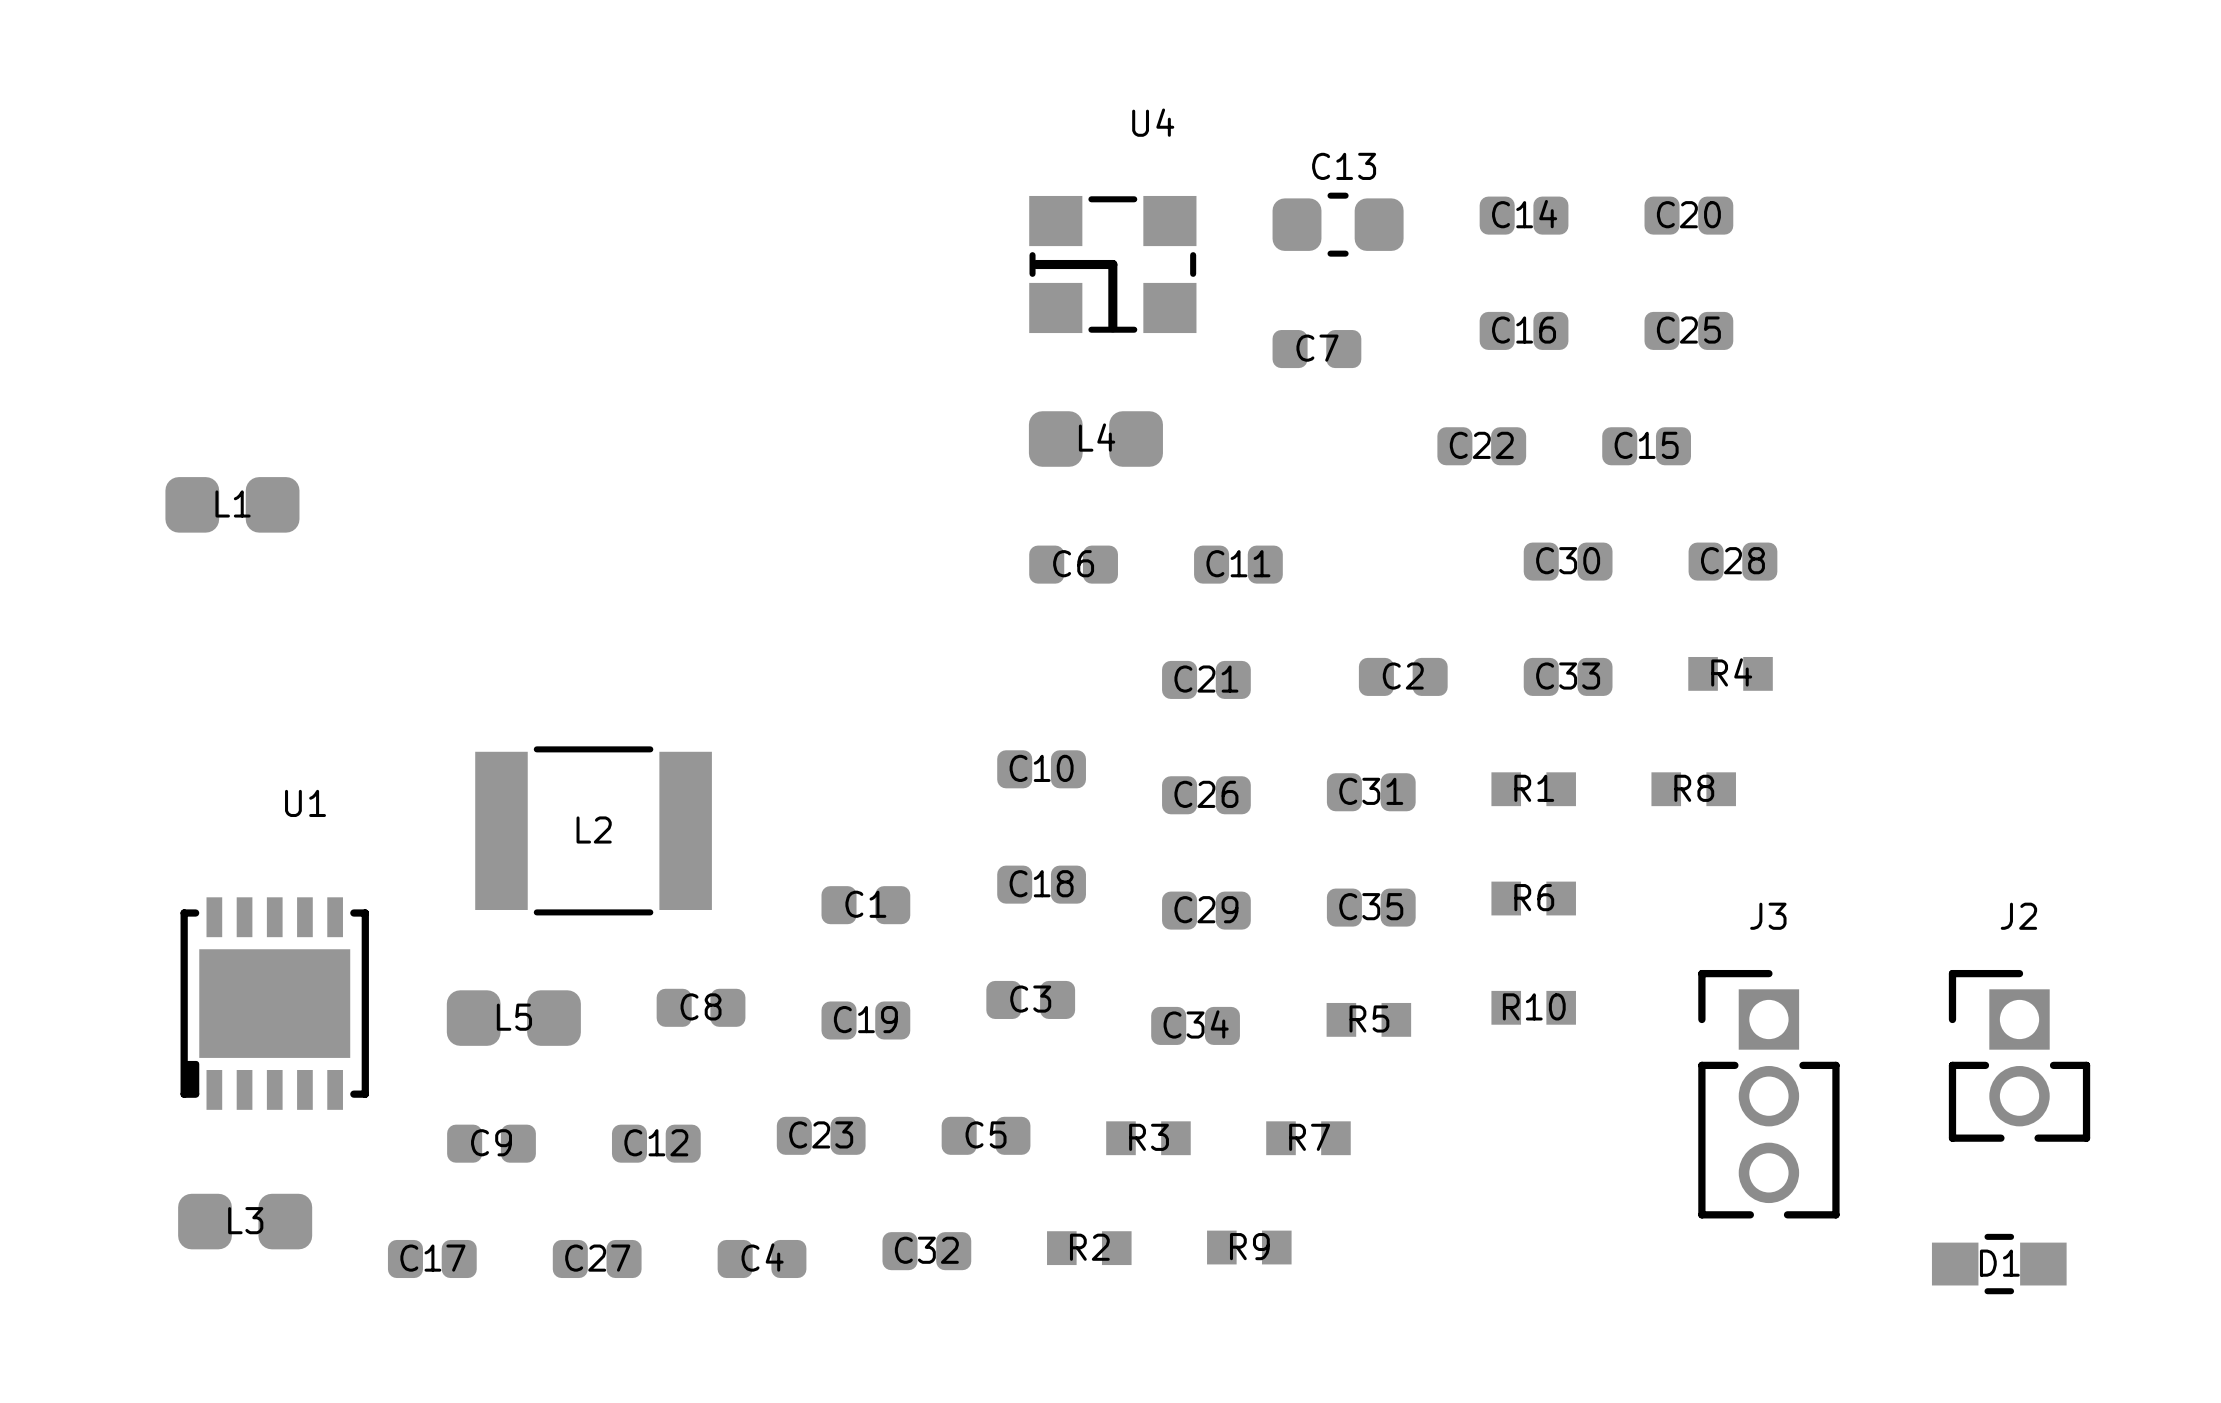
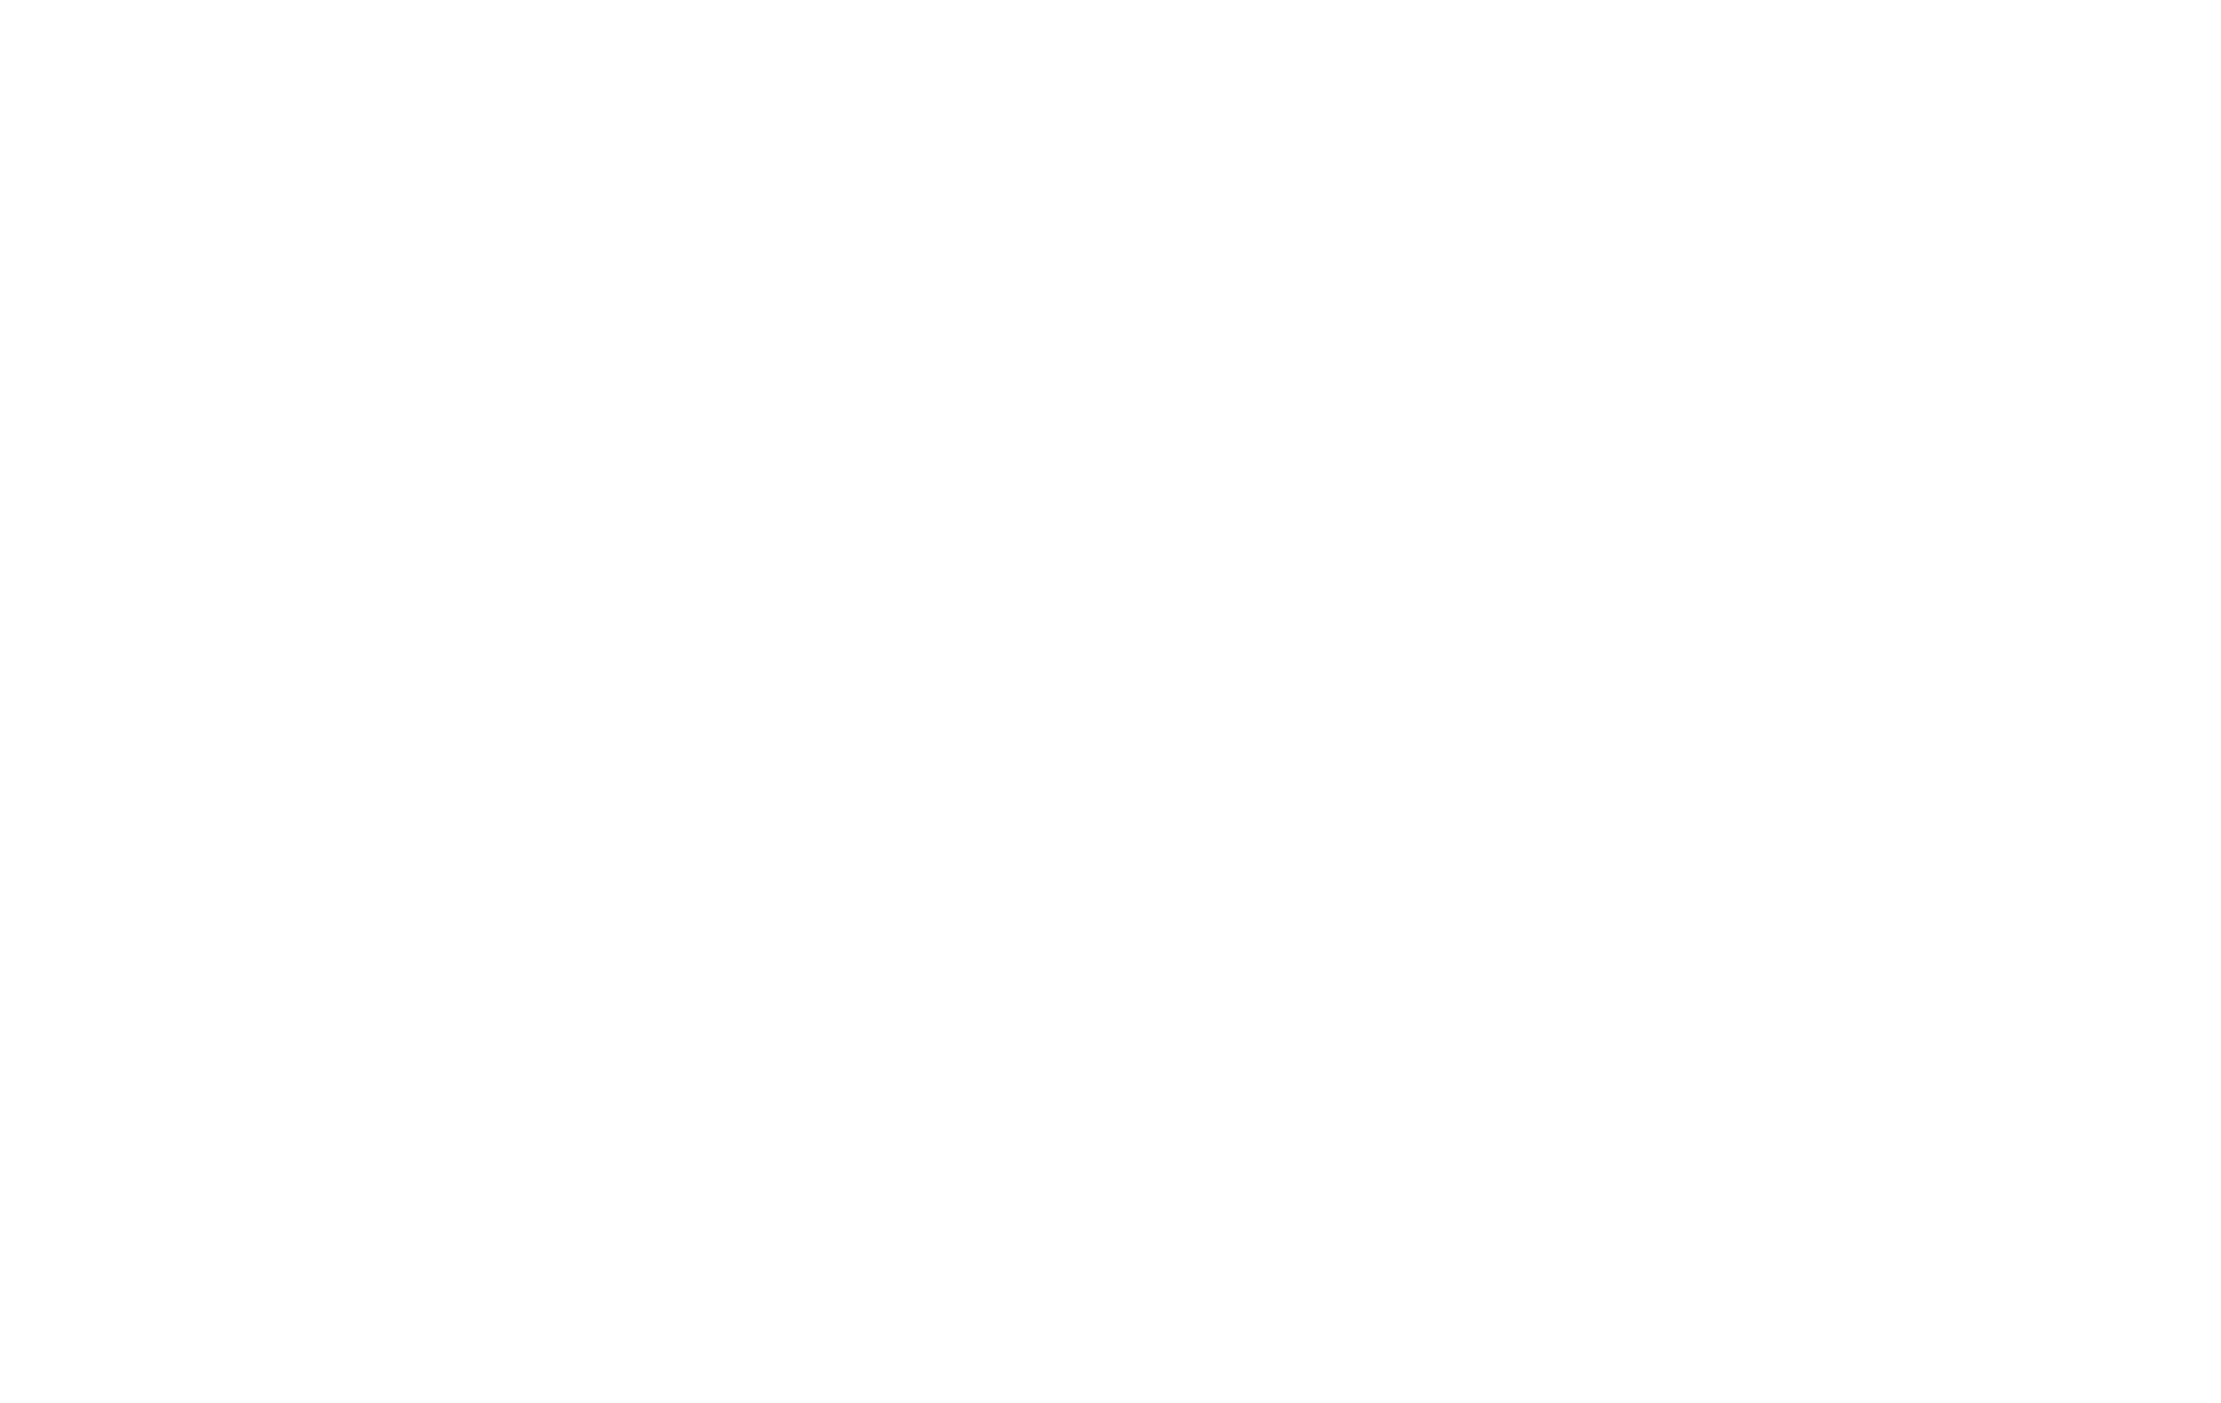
C14: (1524, 215) -> none
C20: (1688, 215) -> none
C13: (1338, 224) -> none
U4: (1112, 264) -> none
C16: (1524, 330) -> none
C25: (1688, 330) -> none
C7: (1316, 349) -> none
L4: (1095, 439) -> none
C22: (1481, 446) -> none
C15: (1646, 446) -> none
L1: (232, 504) -> none
C30: (1568, 561) -> none
C28: (1732, 561) -> none
C6: (1073, 564) -> none
C11: (1238, 564) -> none
R4: (1730, 673) -> none
C2: (1403, 676) -> none
C33: (1568, 676) -> none
C21: (1206, 679) -> none
C10: (1041, 769) -> none
R1: (1533, 789) -> none
R8: (1693, 789) -> none
C31: (1371, 792) -> none
C26: (1206, 795) -> none
L2: (593, 830) -> none
C18: (1041, 884) -> none
R6: (1533, 898) -> none
C1: (865, 905) -> none
C35: (1371, 907) -> none
C29: (1206, 910) -> none
C3: (1030, 999) -> none
U1: (274, 1003) -> none
C8: (701, 1007) -> none
R10: (1533, 1007) -> none
L5: (513, 1018) -> none
R5: (1368, 1019) -> none
C19: (865, 1020) -> none
C34: (1195, 1025) -> none
J2: (2019, 1055) -> none
J3: (1768, 1094) -> none
C23: (821, 1135) -> none
C5: (986, 1135) -> none
R3: (1148, 1138) -> none
R7: (1308, 1138) -> none
C9: (491, 1143) -> none
C12: (656, 1143) -> none
L3: (245, 1221) -> none
R9: (1249, 1247) -> none
R2: (1089, 1248) -> none
C32: (926, 1251) -> none
C17: (432, 1259) -> none
C27: (597, 1259) -> none
C4: (762, 1259) -> none
D1: (1999, 1264) -> none

